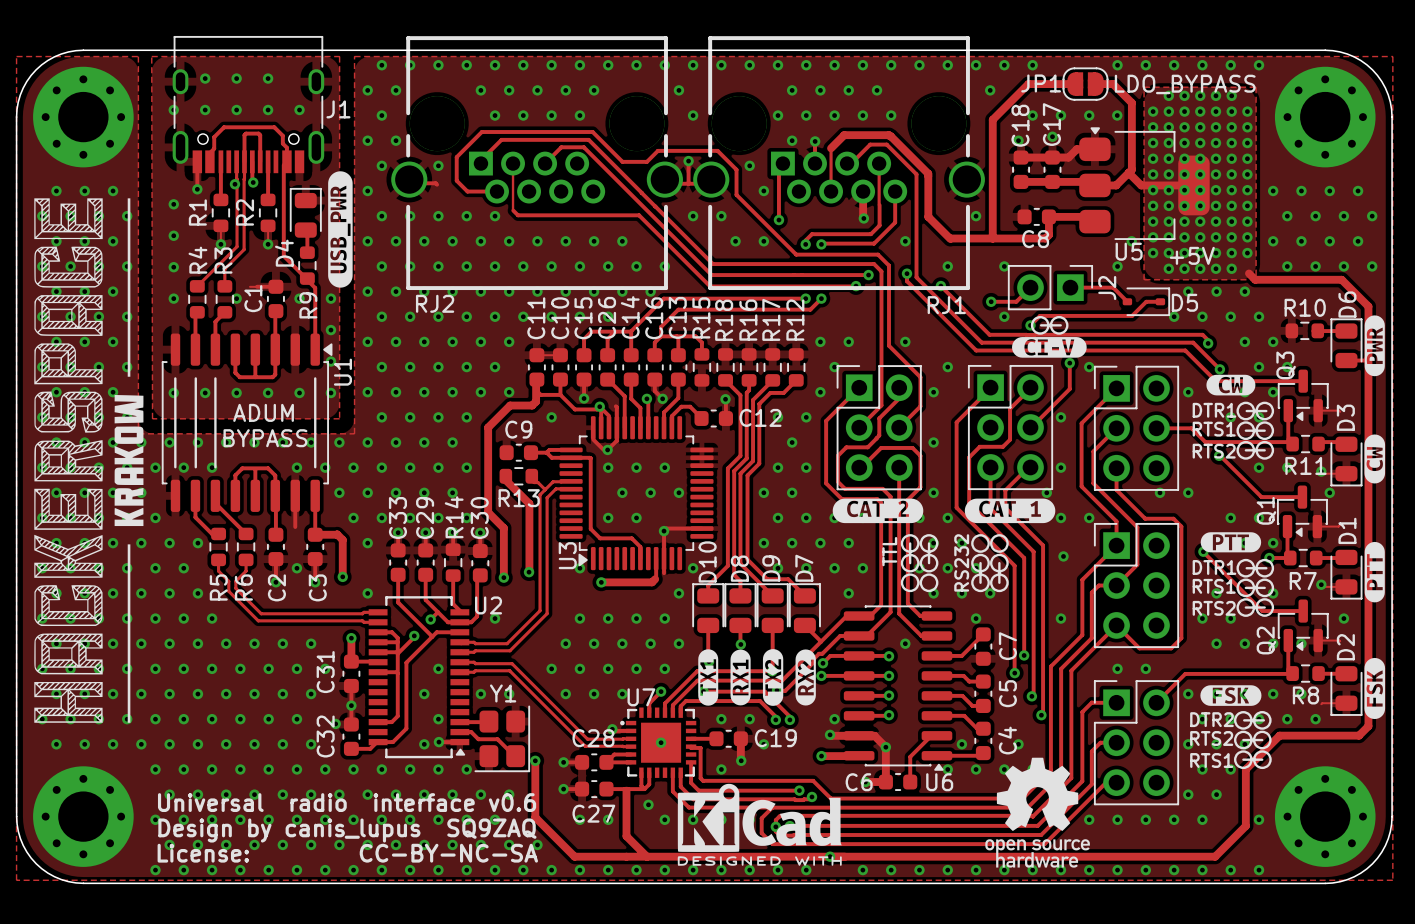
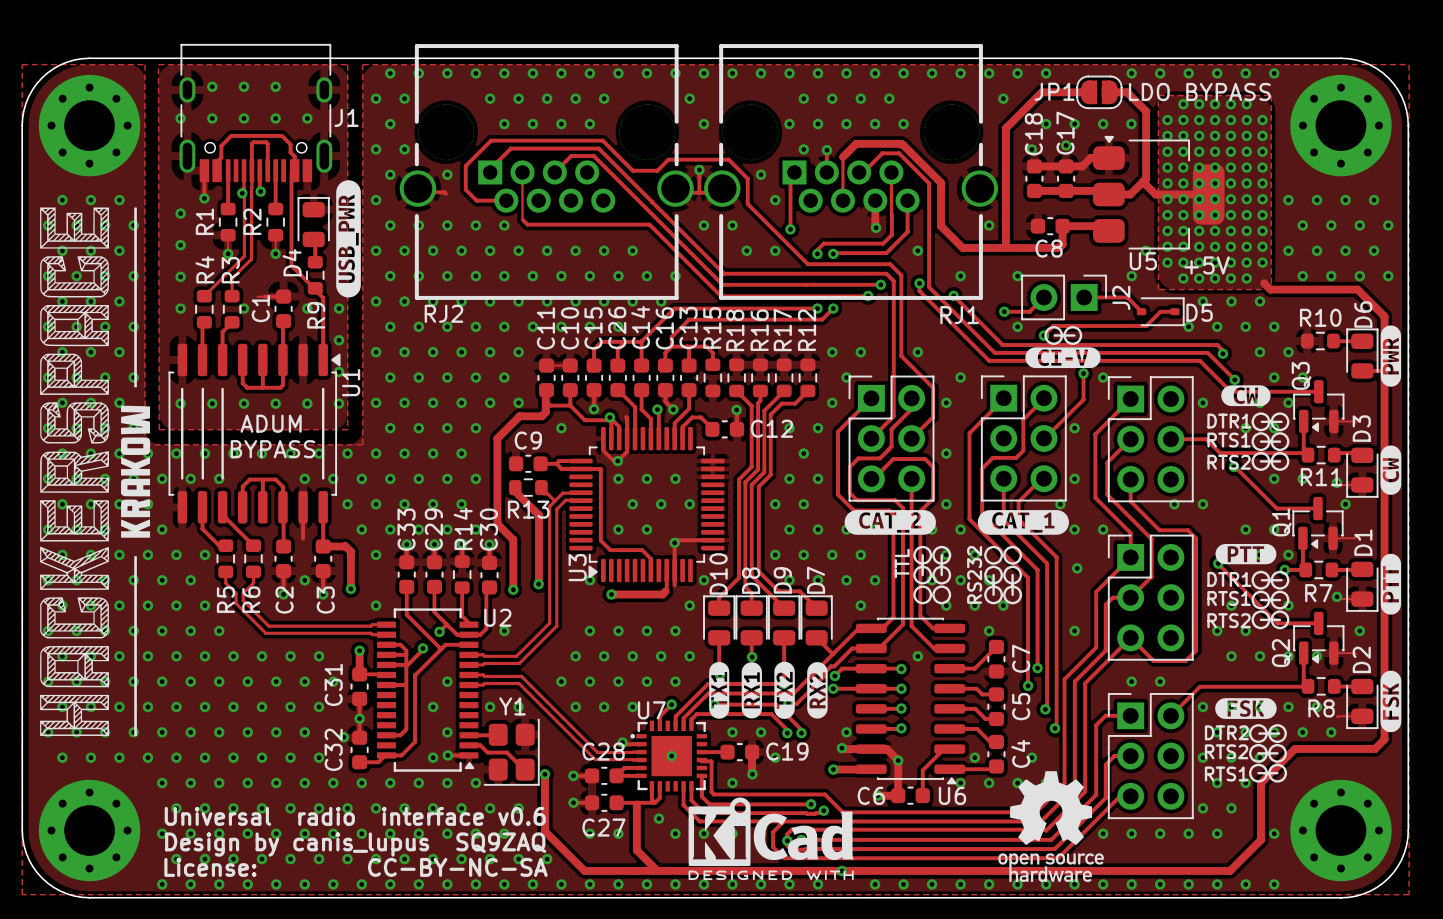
text: LDO_BYPASS (1185, 84) -> LDO BYPASS (1199, 91)

